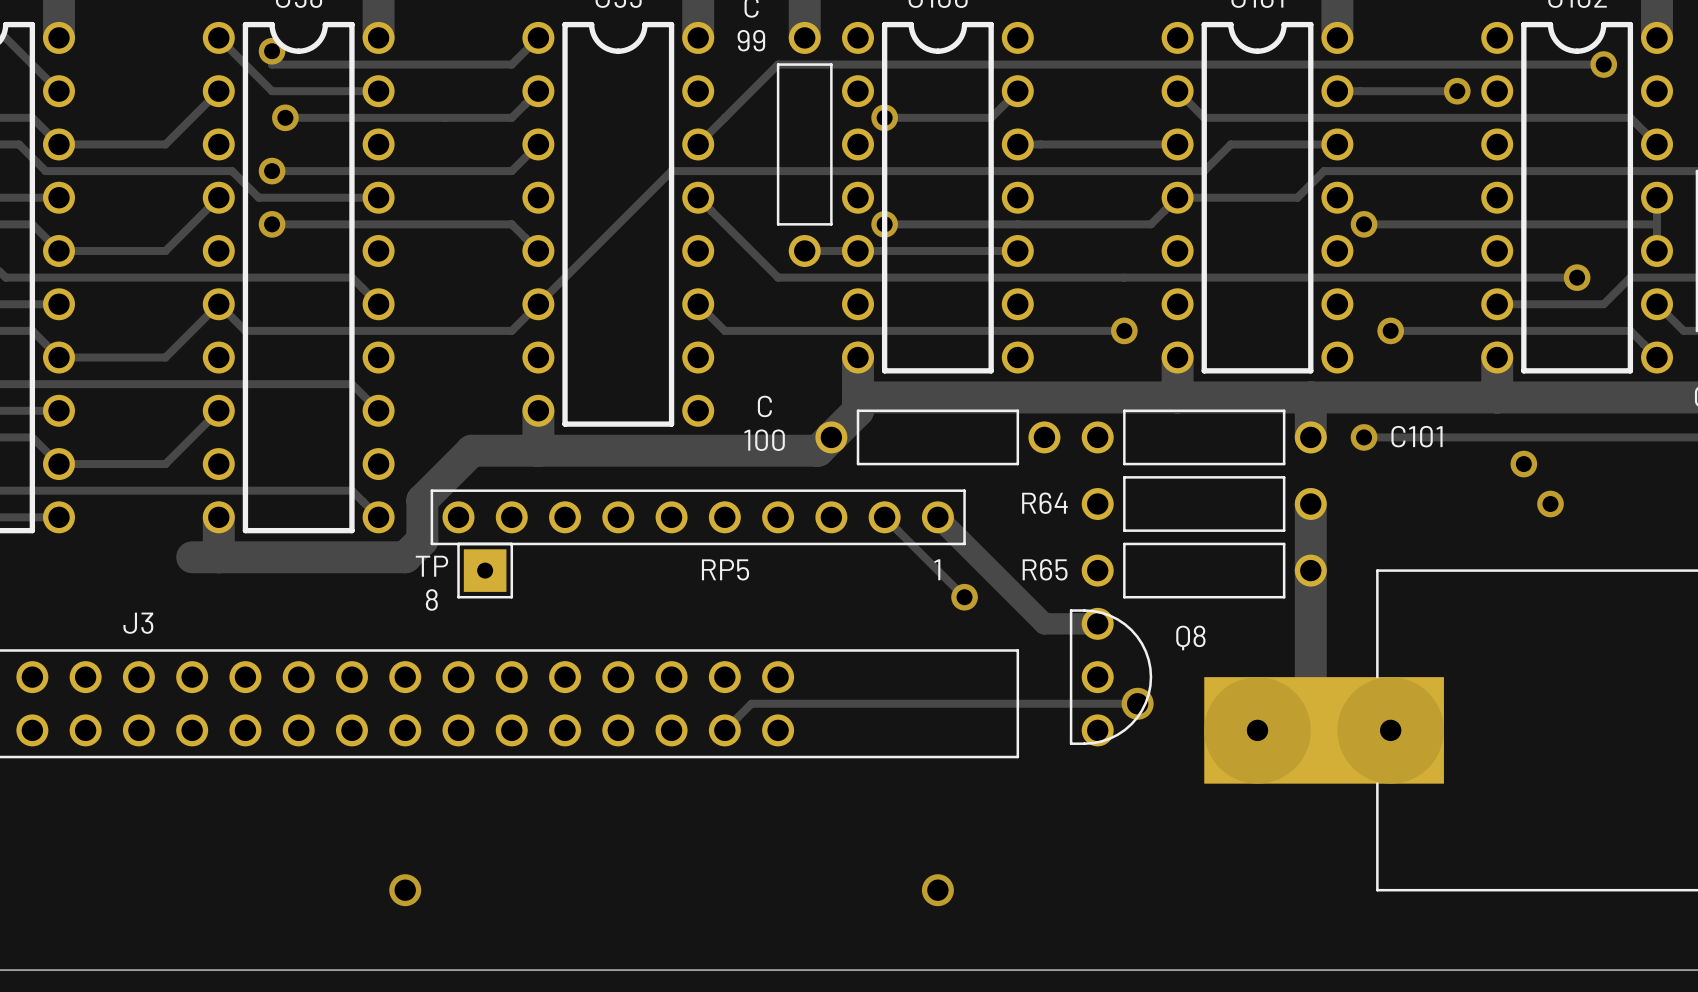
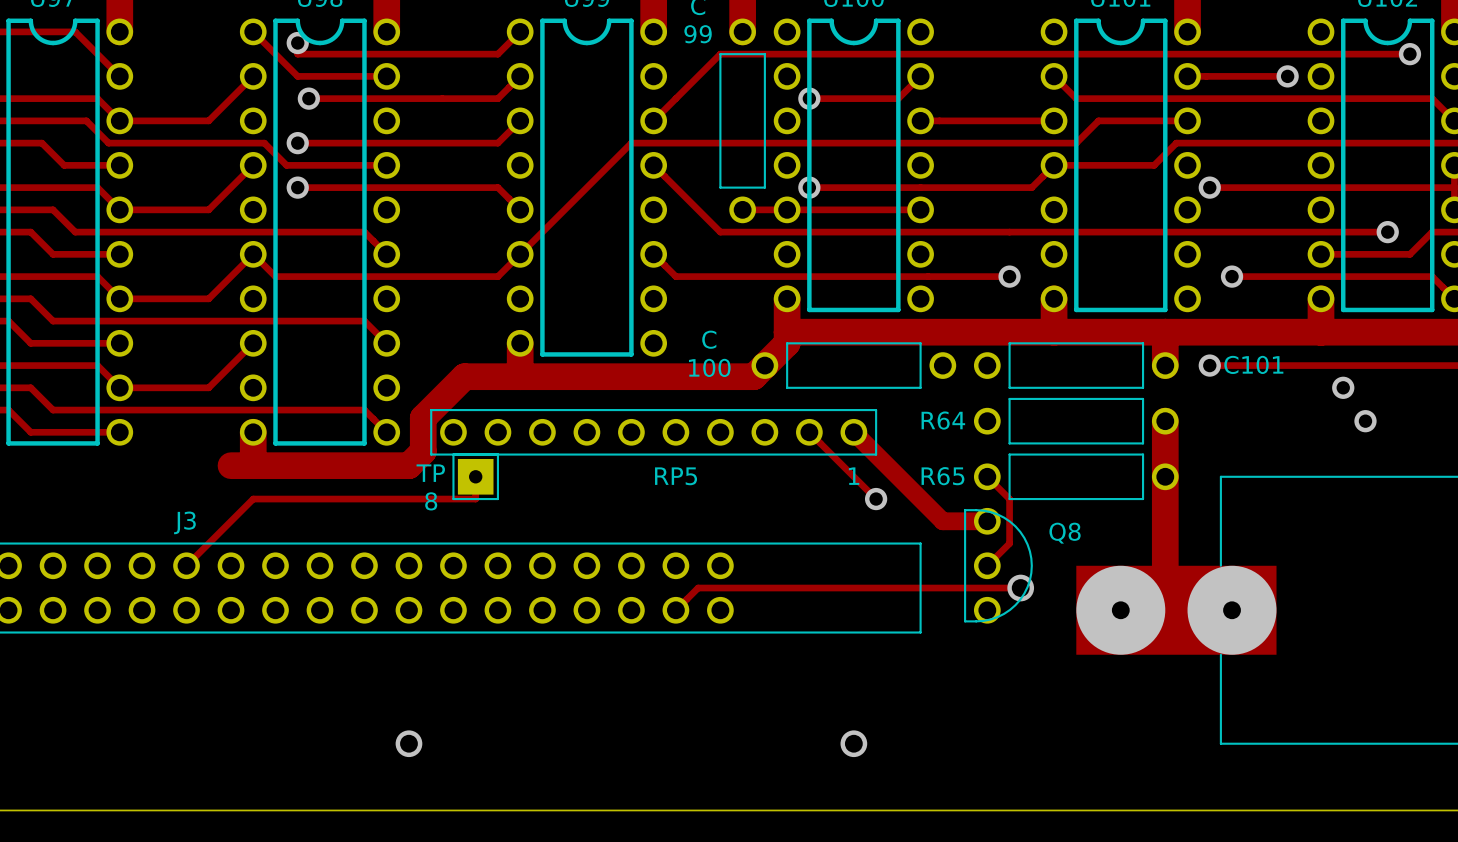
track: none -> (475, 476) (475, 499) (253, 499) (186, 565)
track: none -> (987, 476) (1009, 499) (1009, 543) (987, 565)

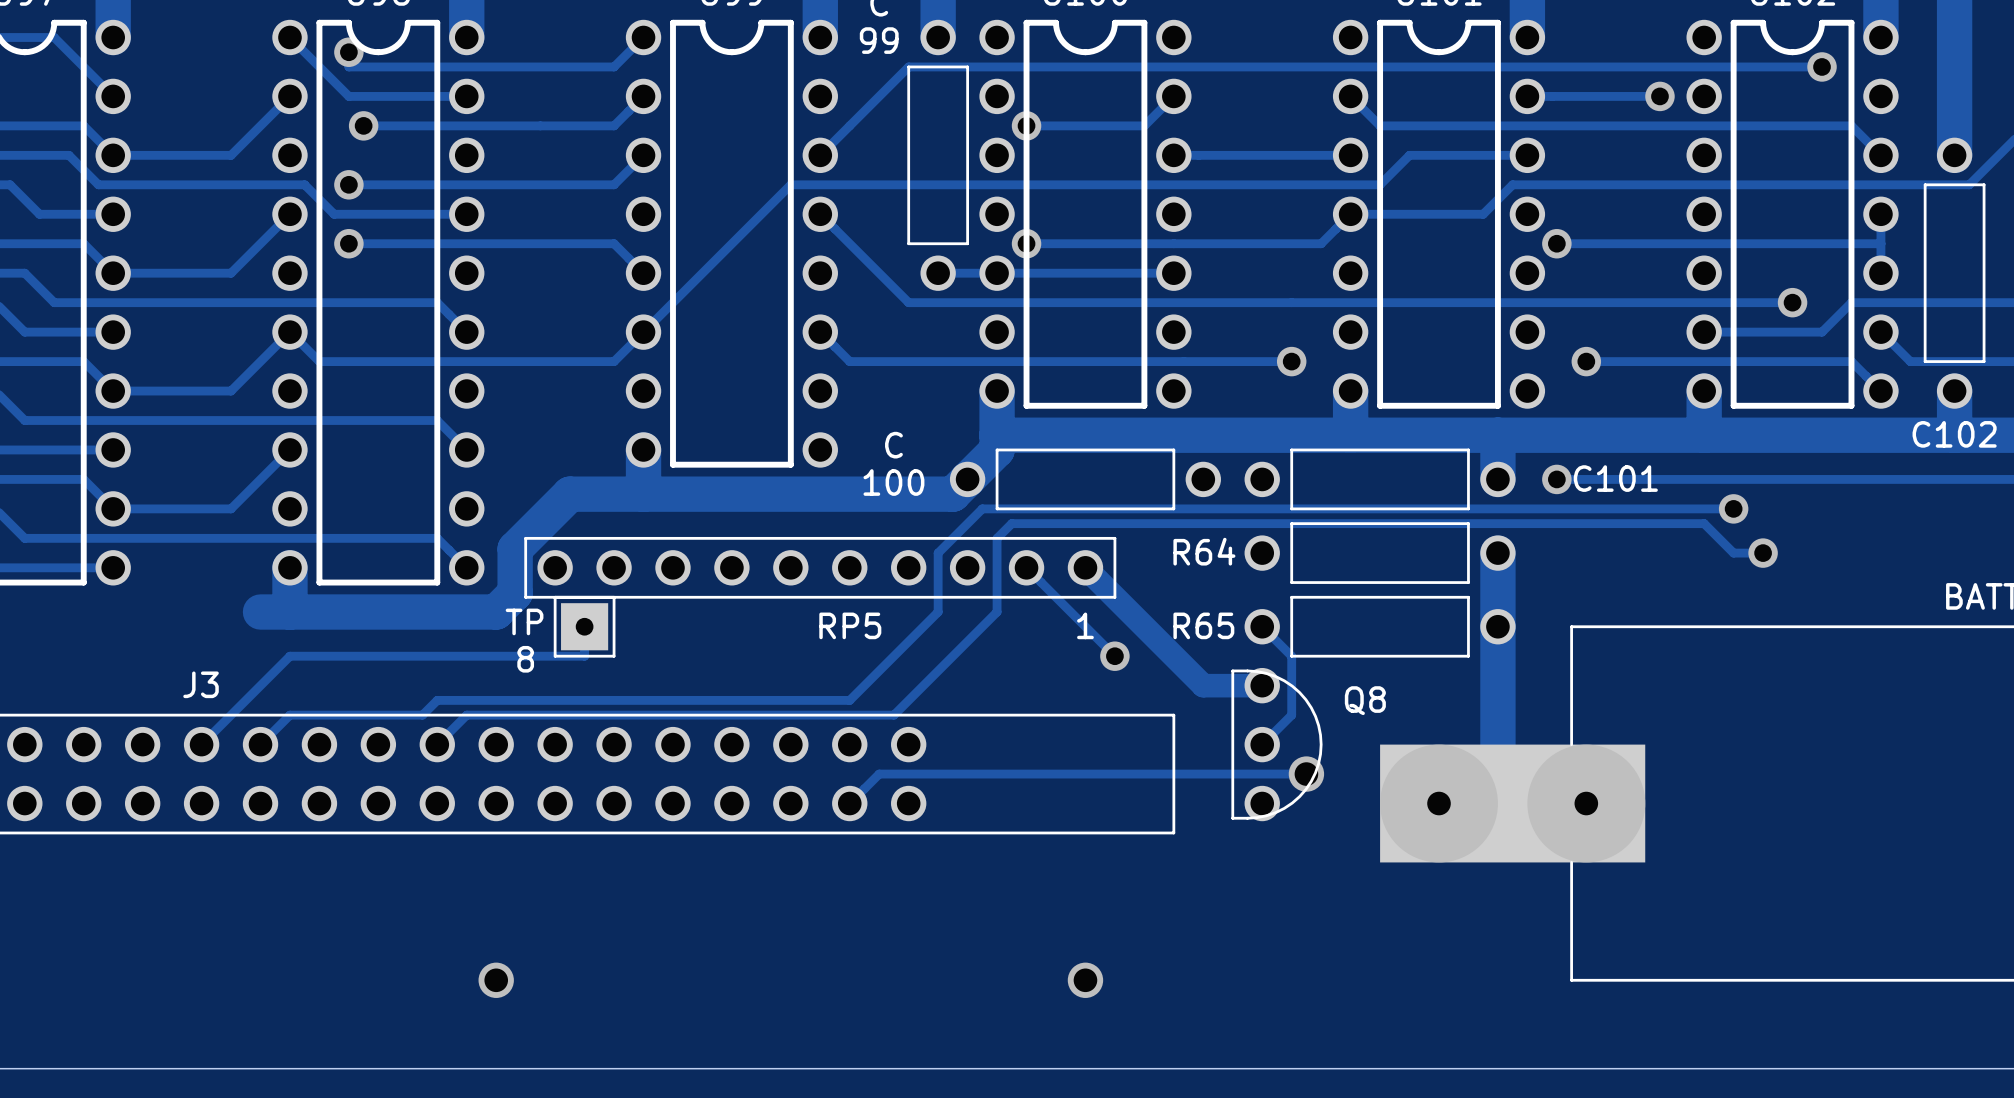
track: none -> (1733, 508) (982, 508) (938, 553) (938, 612) (849, 700) (437, 700) (422, 715) (289, 715) (260, 744)
track: none -> (1763, 553) (1733, 553) (1704, 523) (1011, 523) (997, 538) (997, 612) (893, 715) (466, 715) (437, 744)

